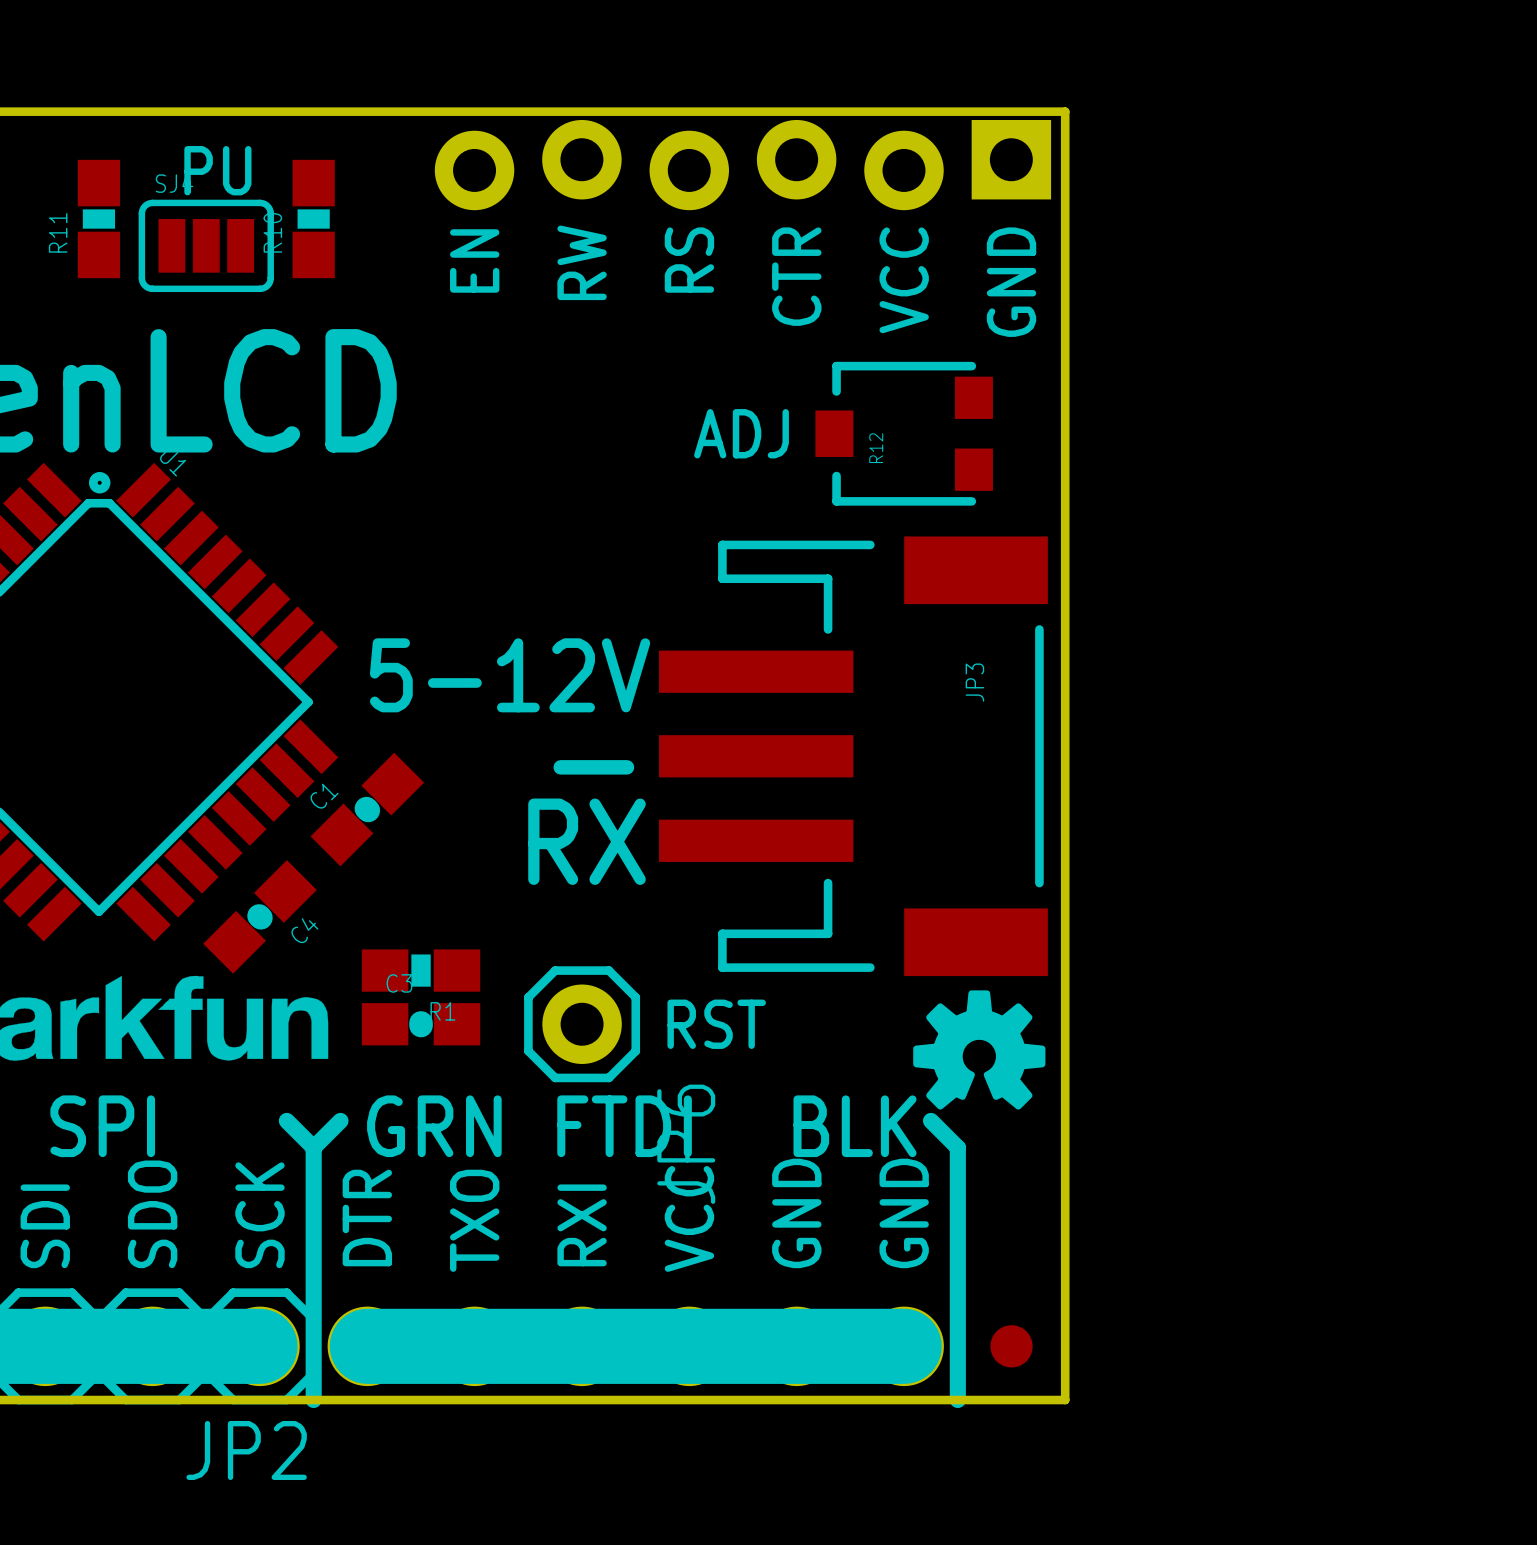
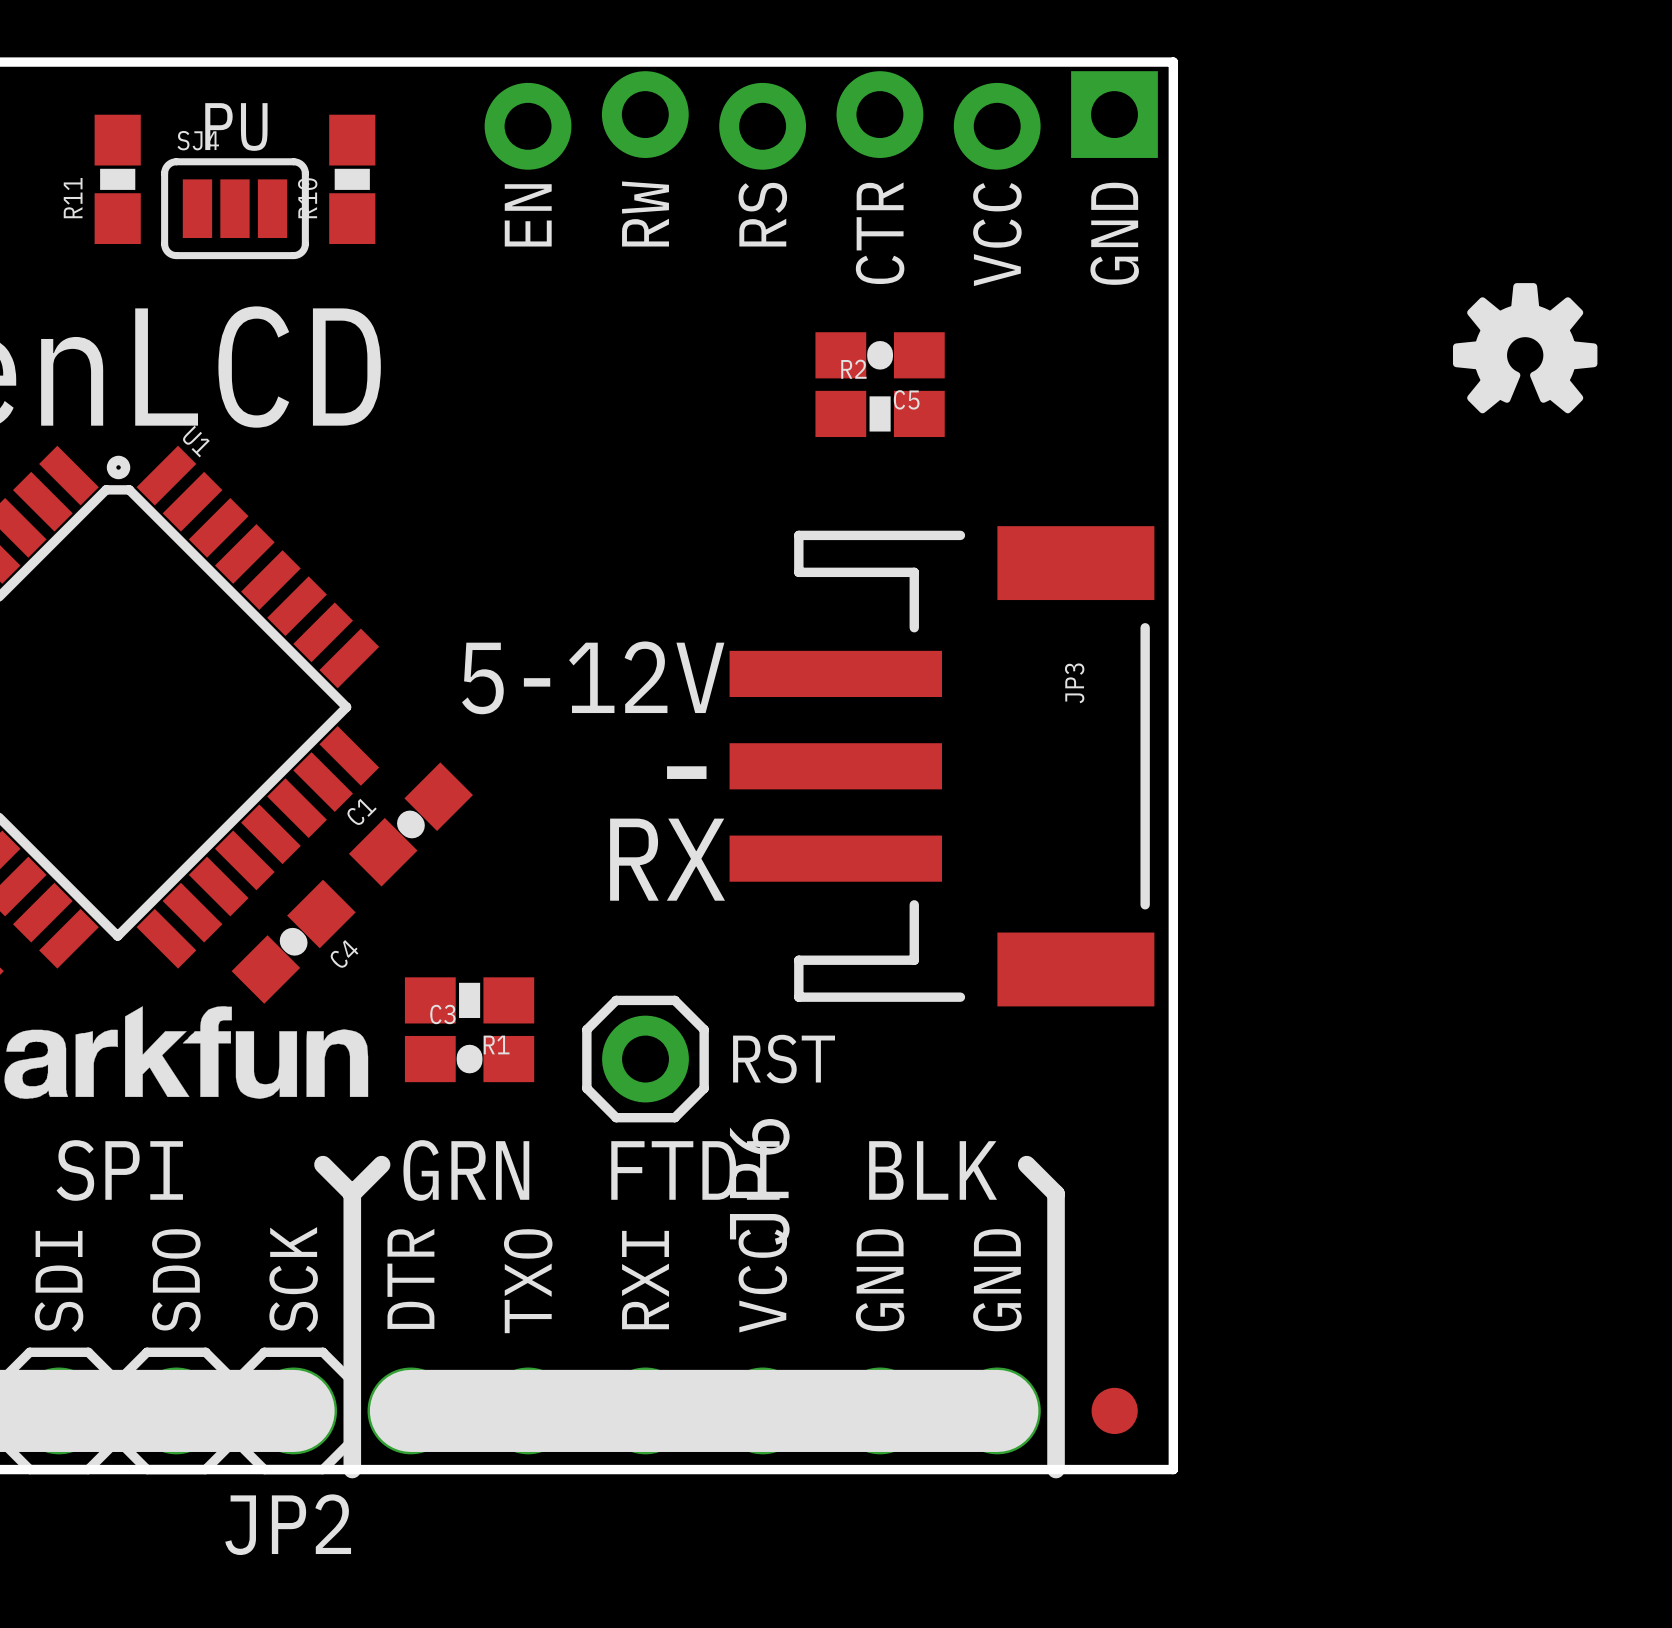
C5: none -> (880, 355)
text: ADJ (741, 433) -> none
R2: none -> (880, 413)
R12: (904, 433) -> none
drawing position: (979, 1049) -> (1525, 348)

